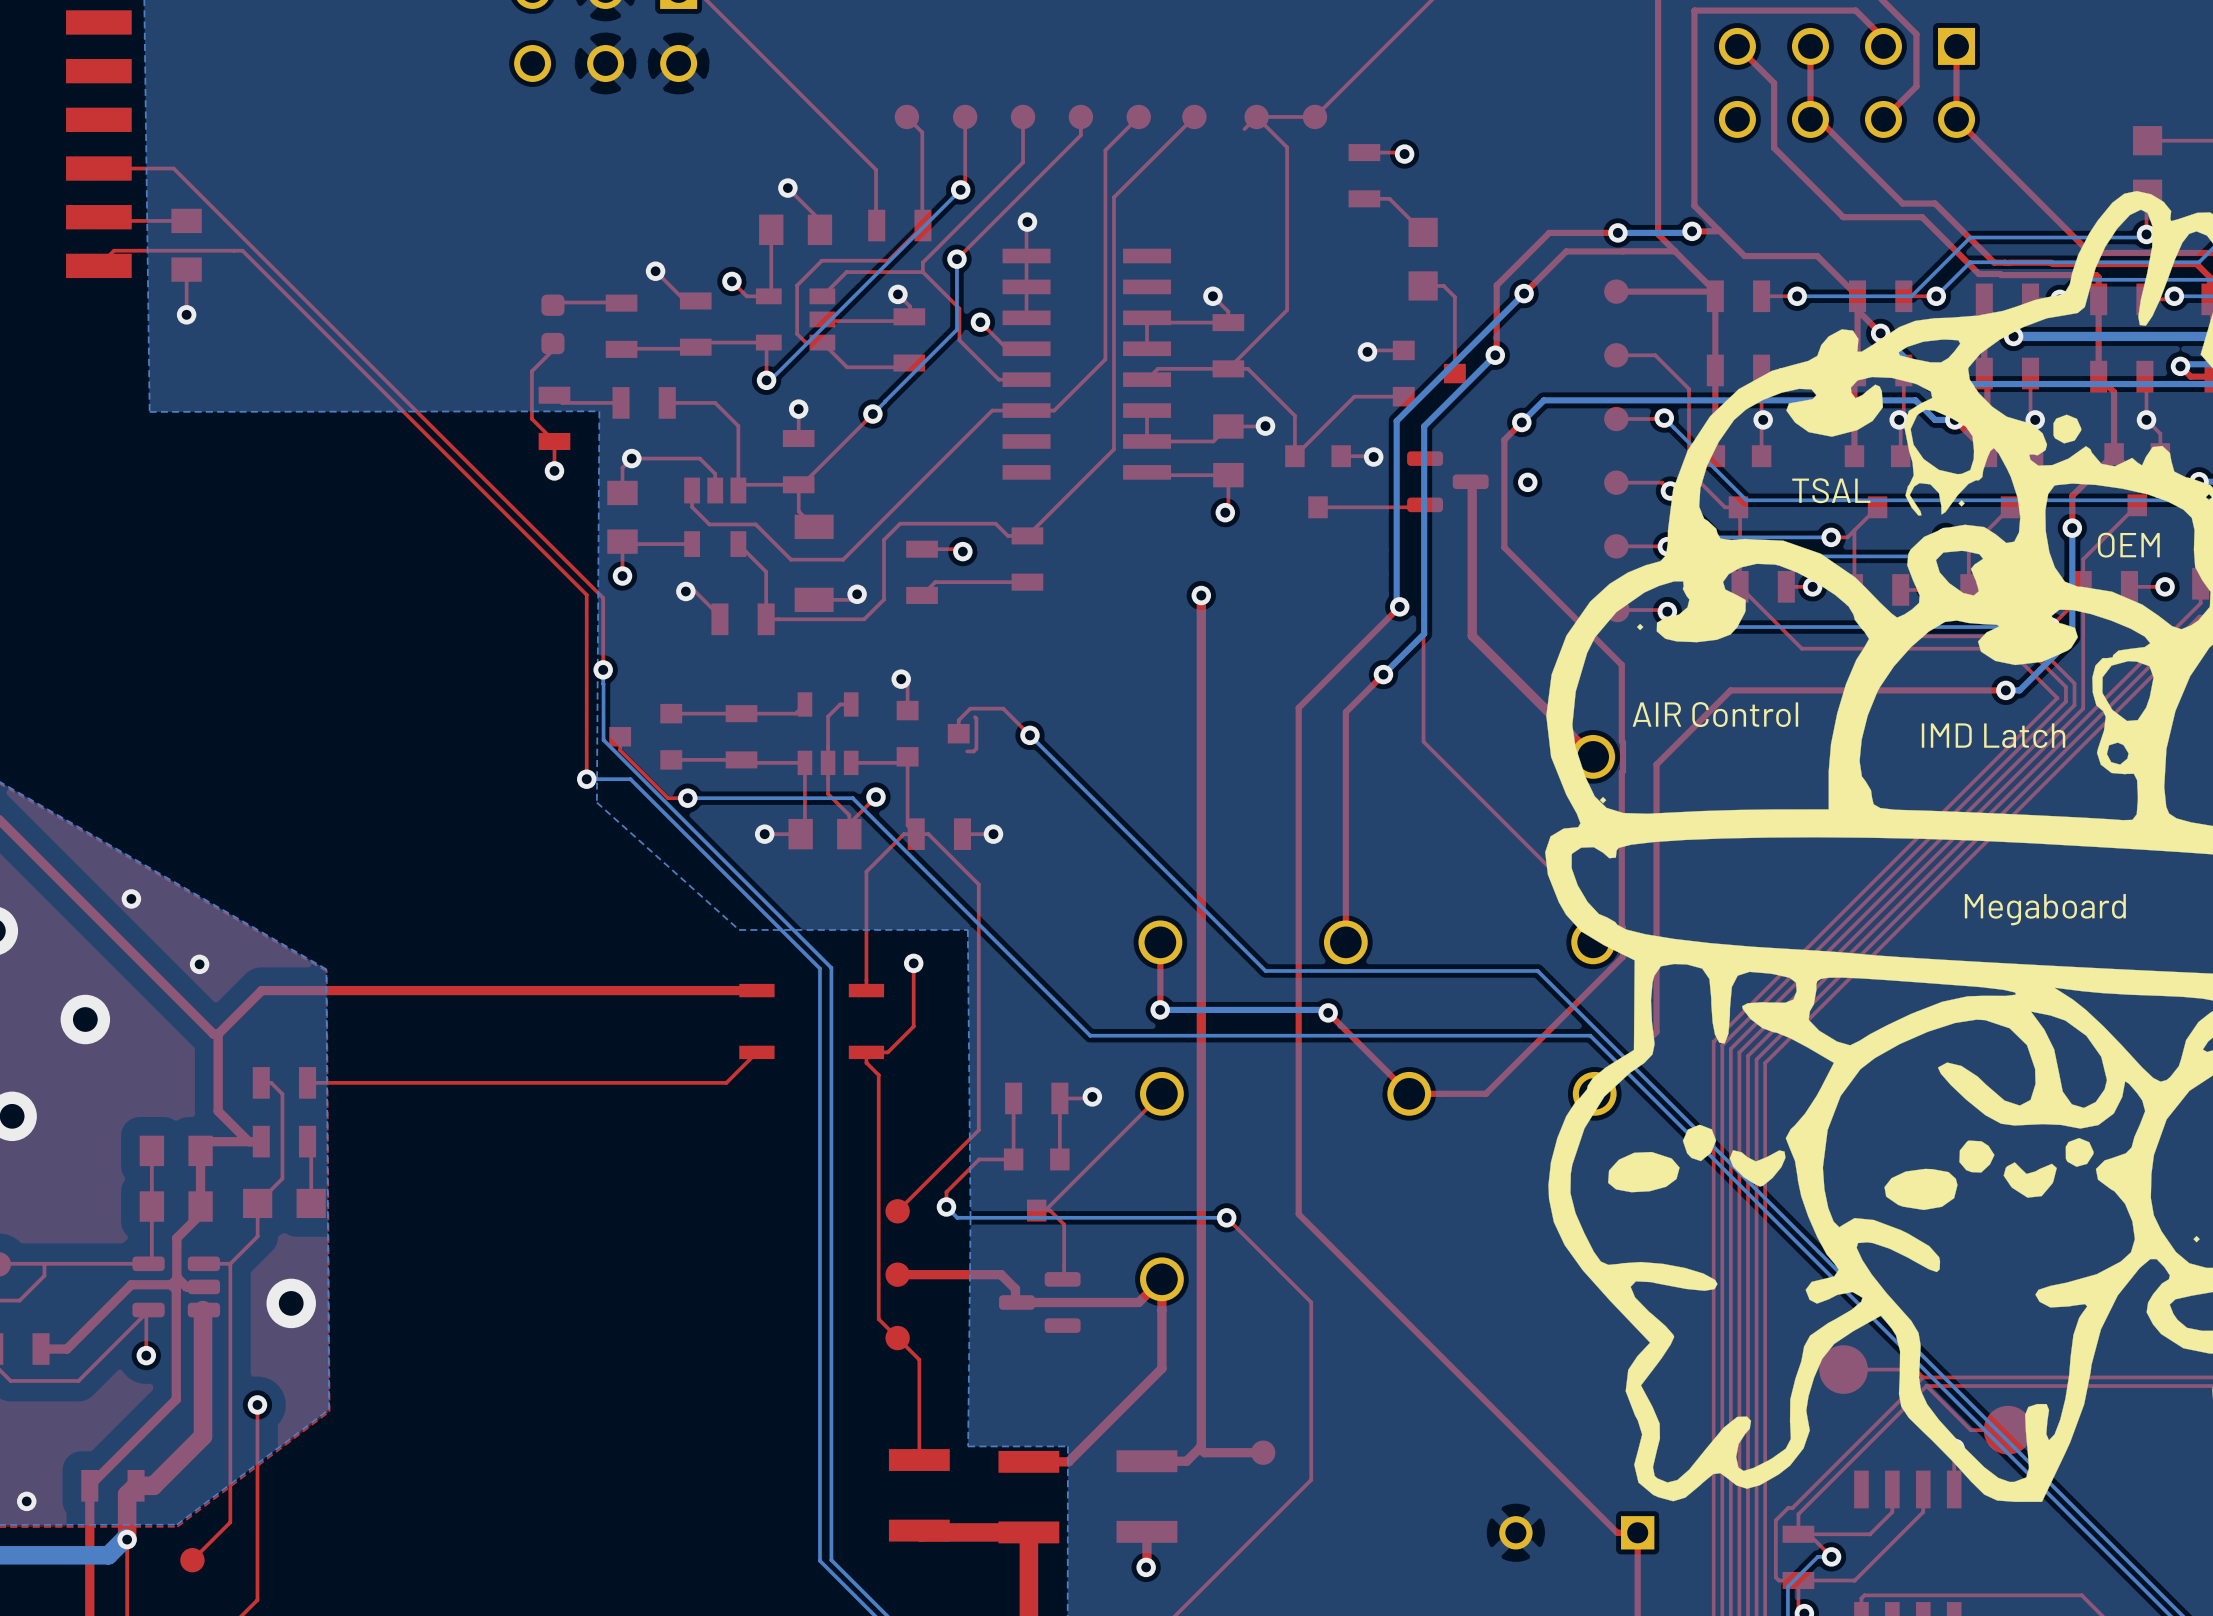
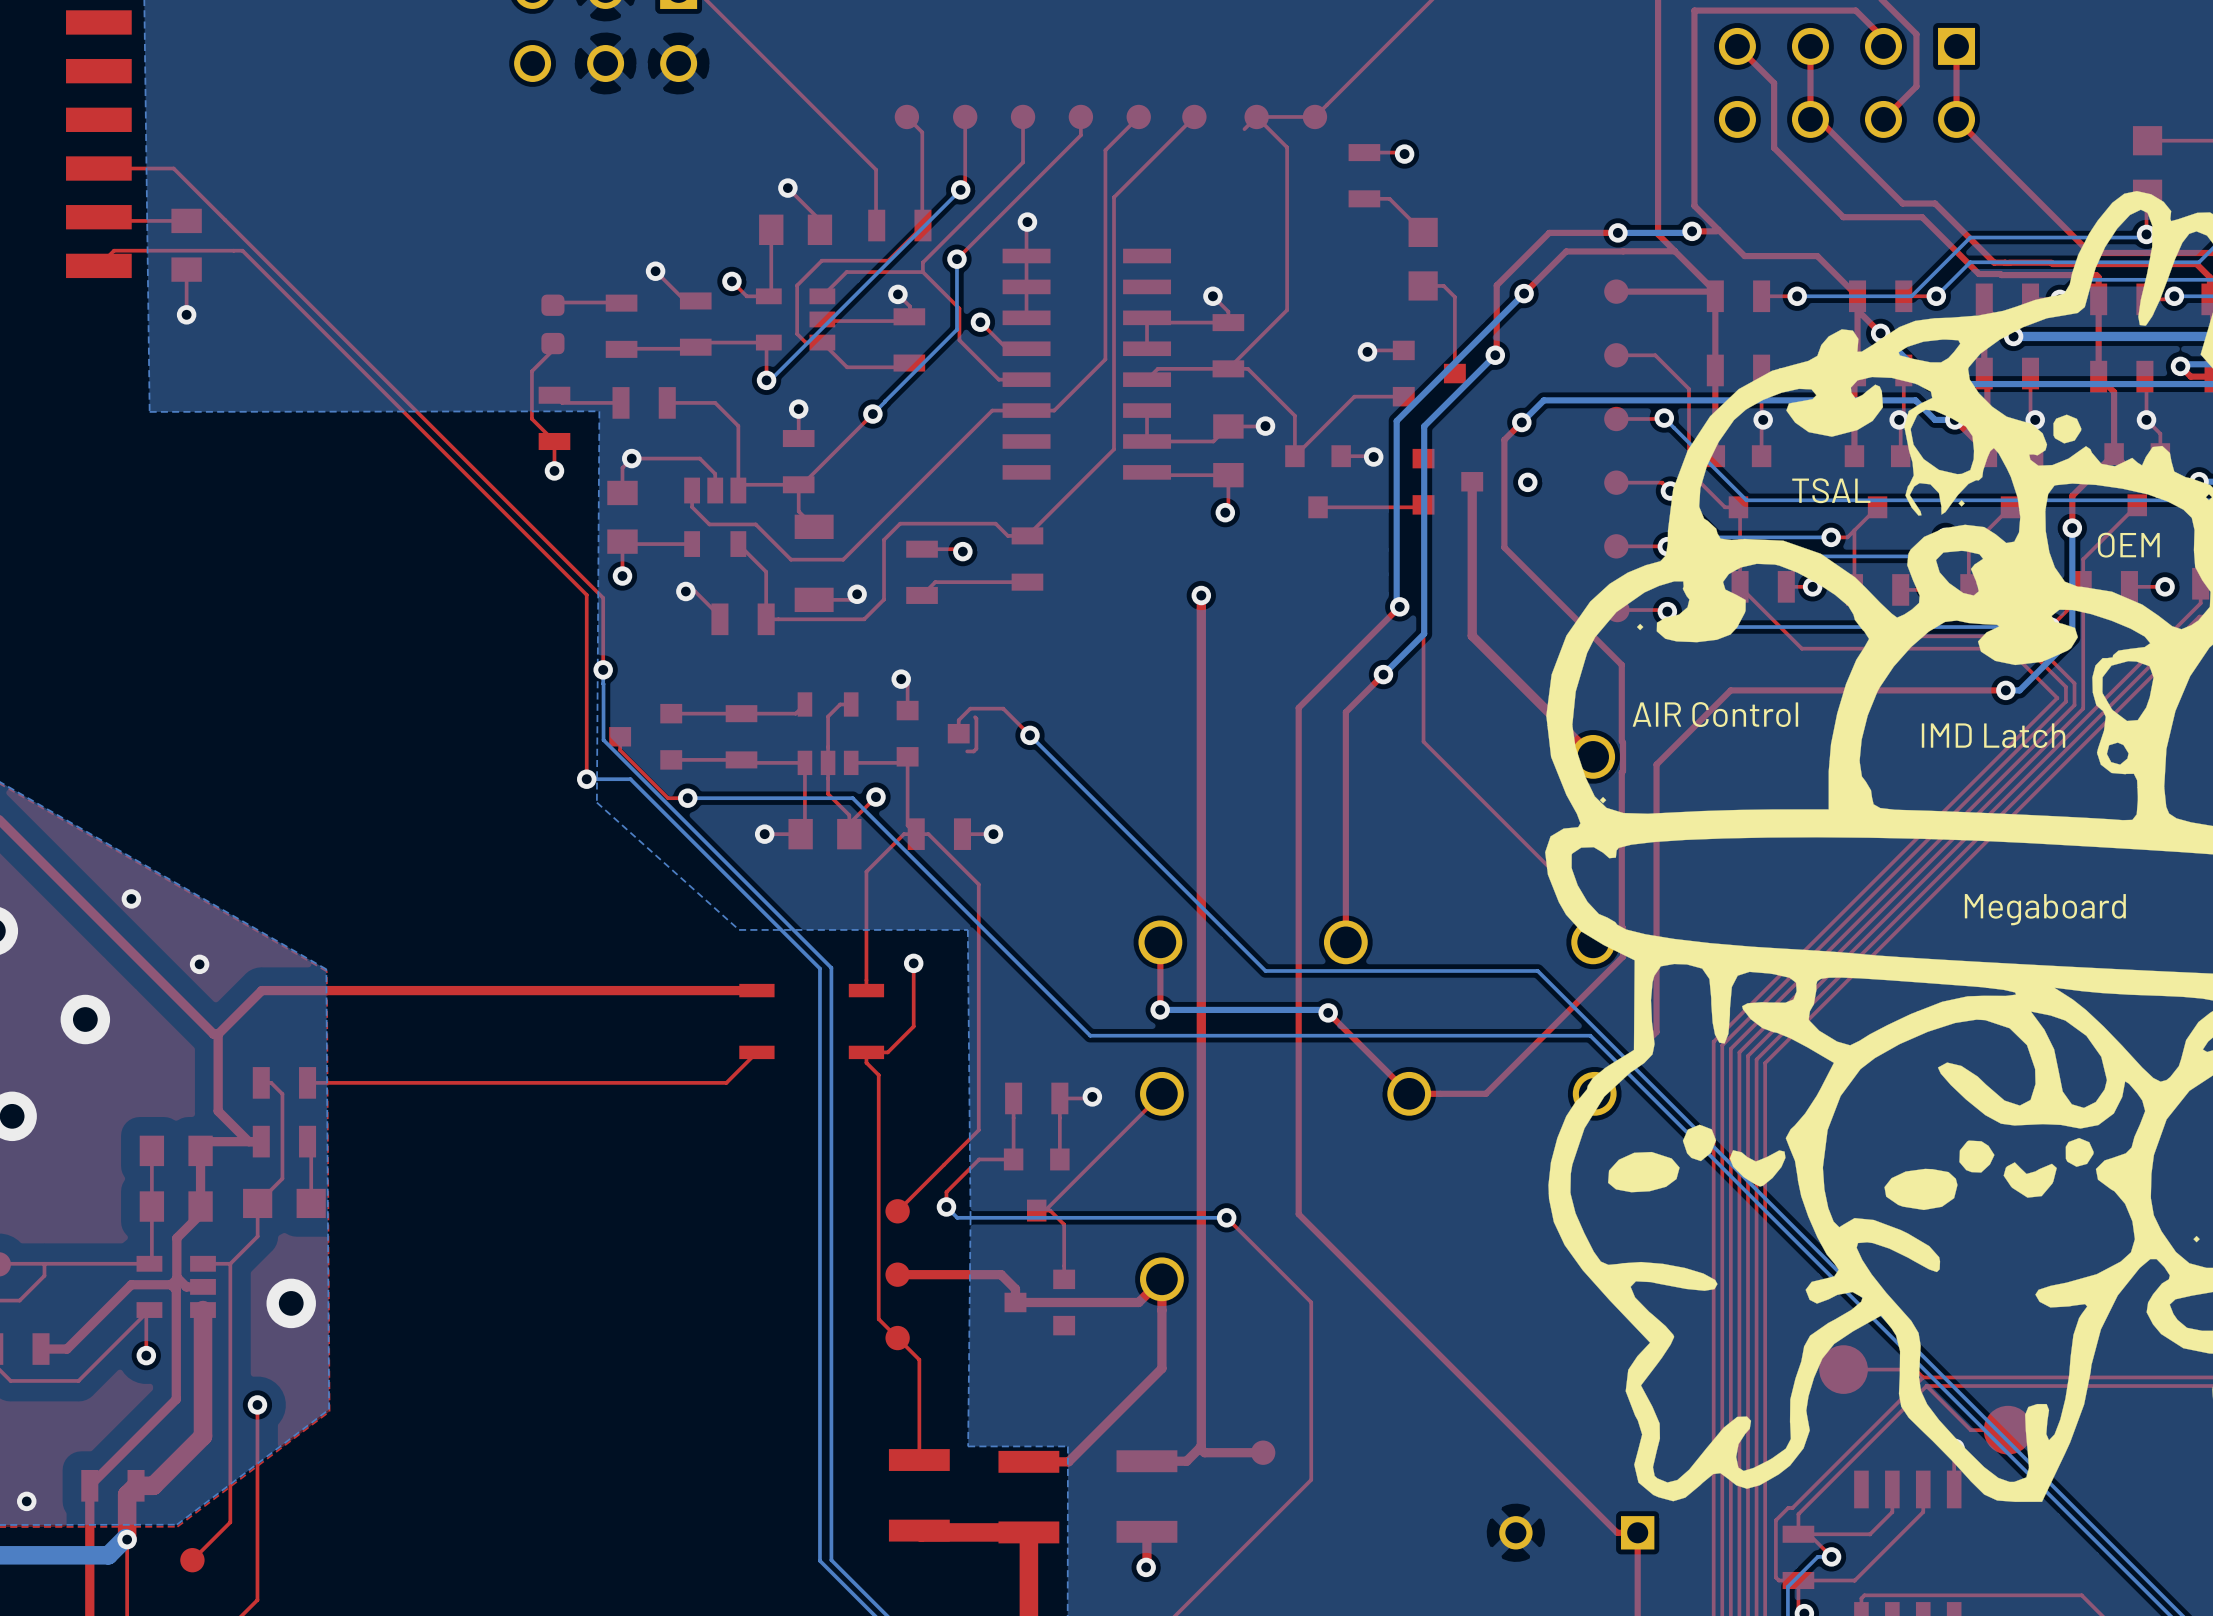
part footprint: [1407, 451, 1489, 513] -> [1412, 448, 1484, 515]
part footprint: [132, 1256, 221, 1318] -> [136, 1255, 216, 1318]
part footprint: [999, 1272, 1081, 1333] -> [1004, 1269, 1076, 1336]

